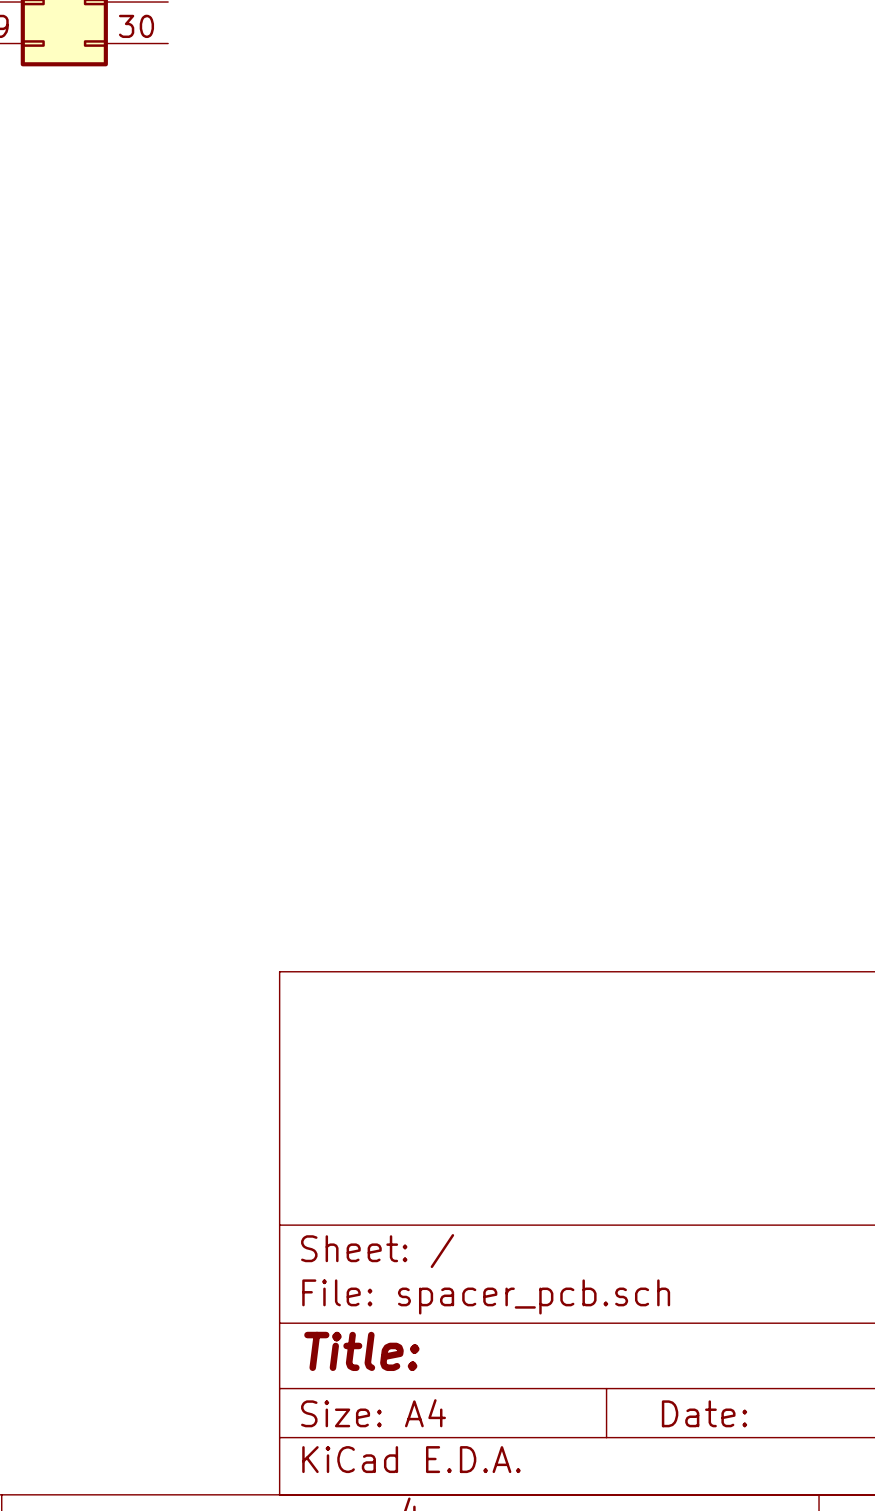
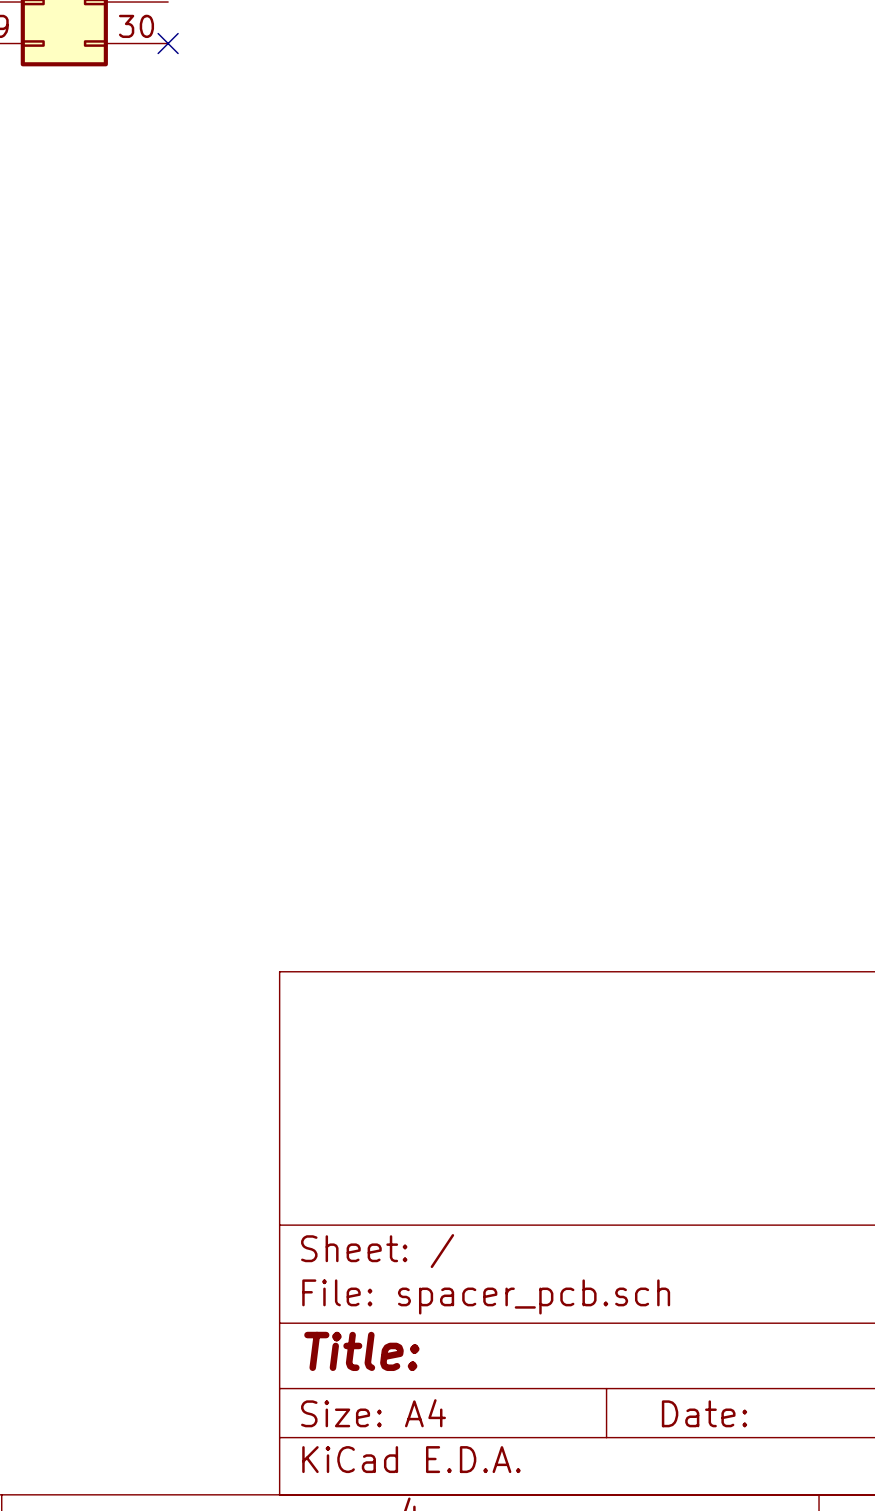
no-connect mark: none -> (168, 43)

